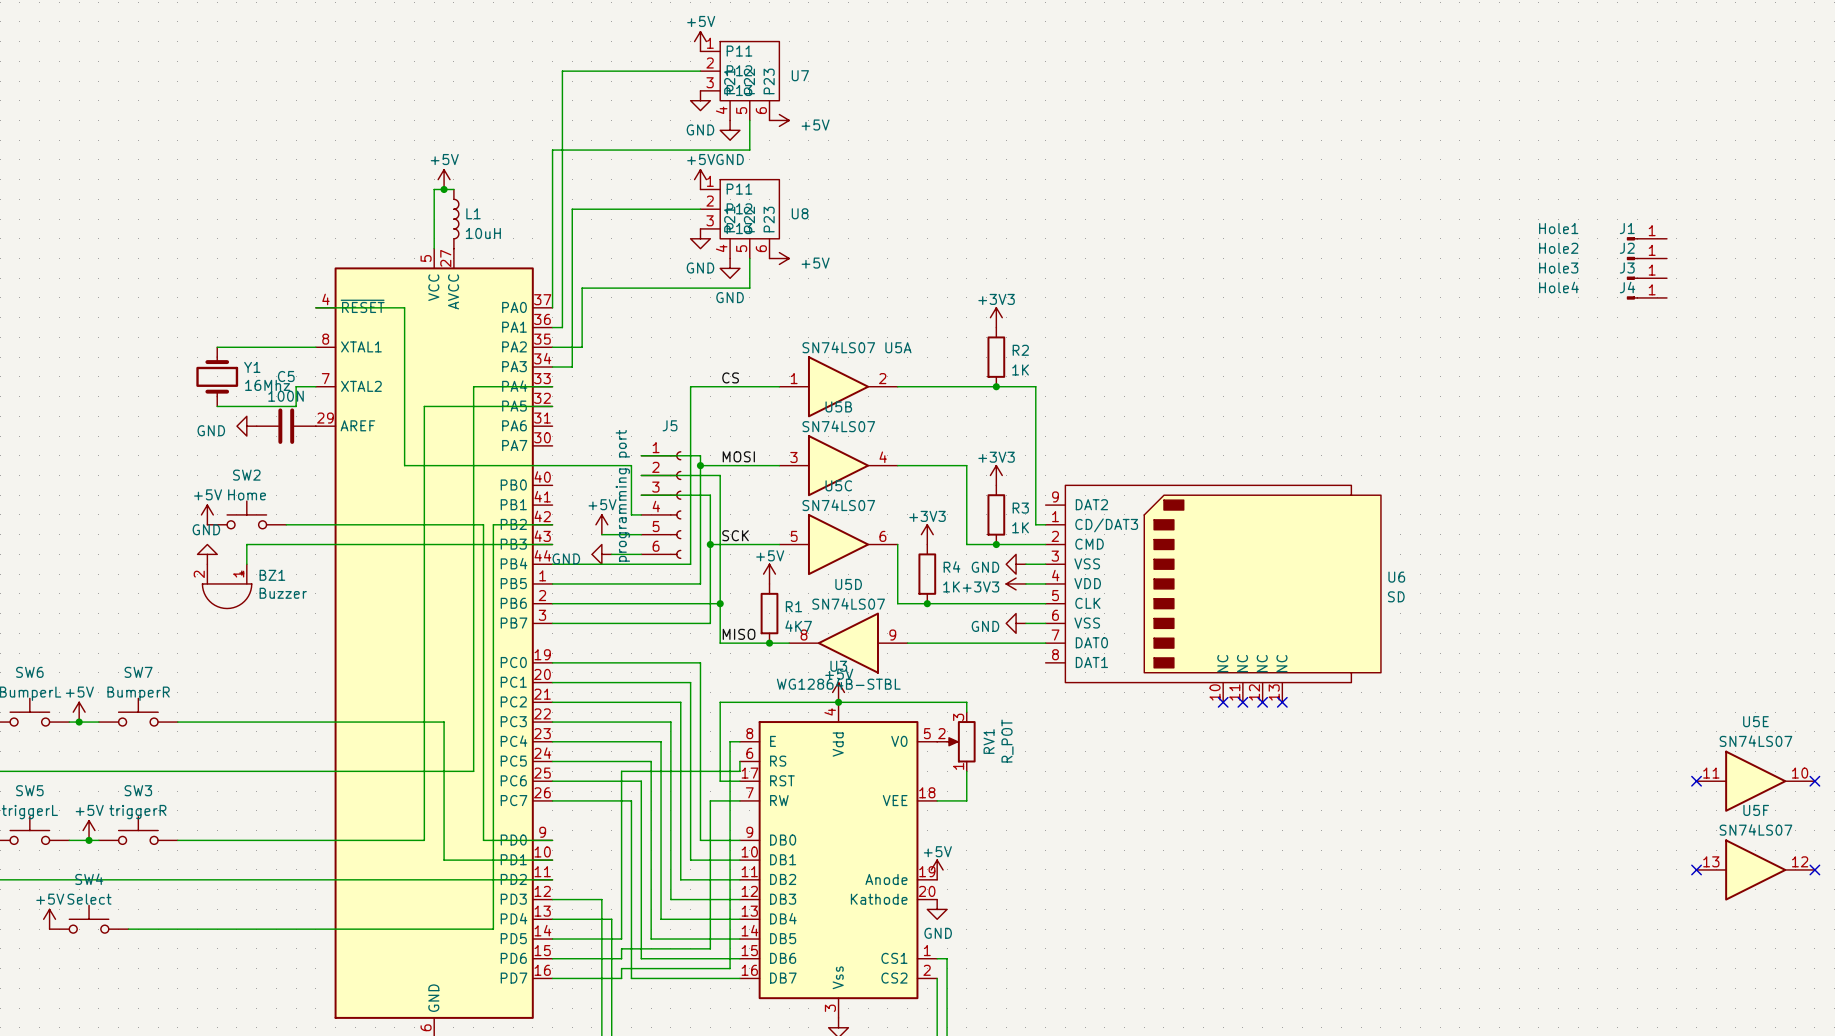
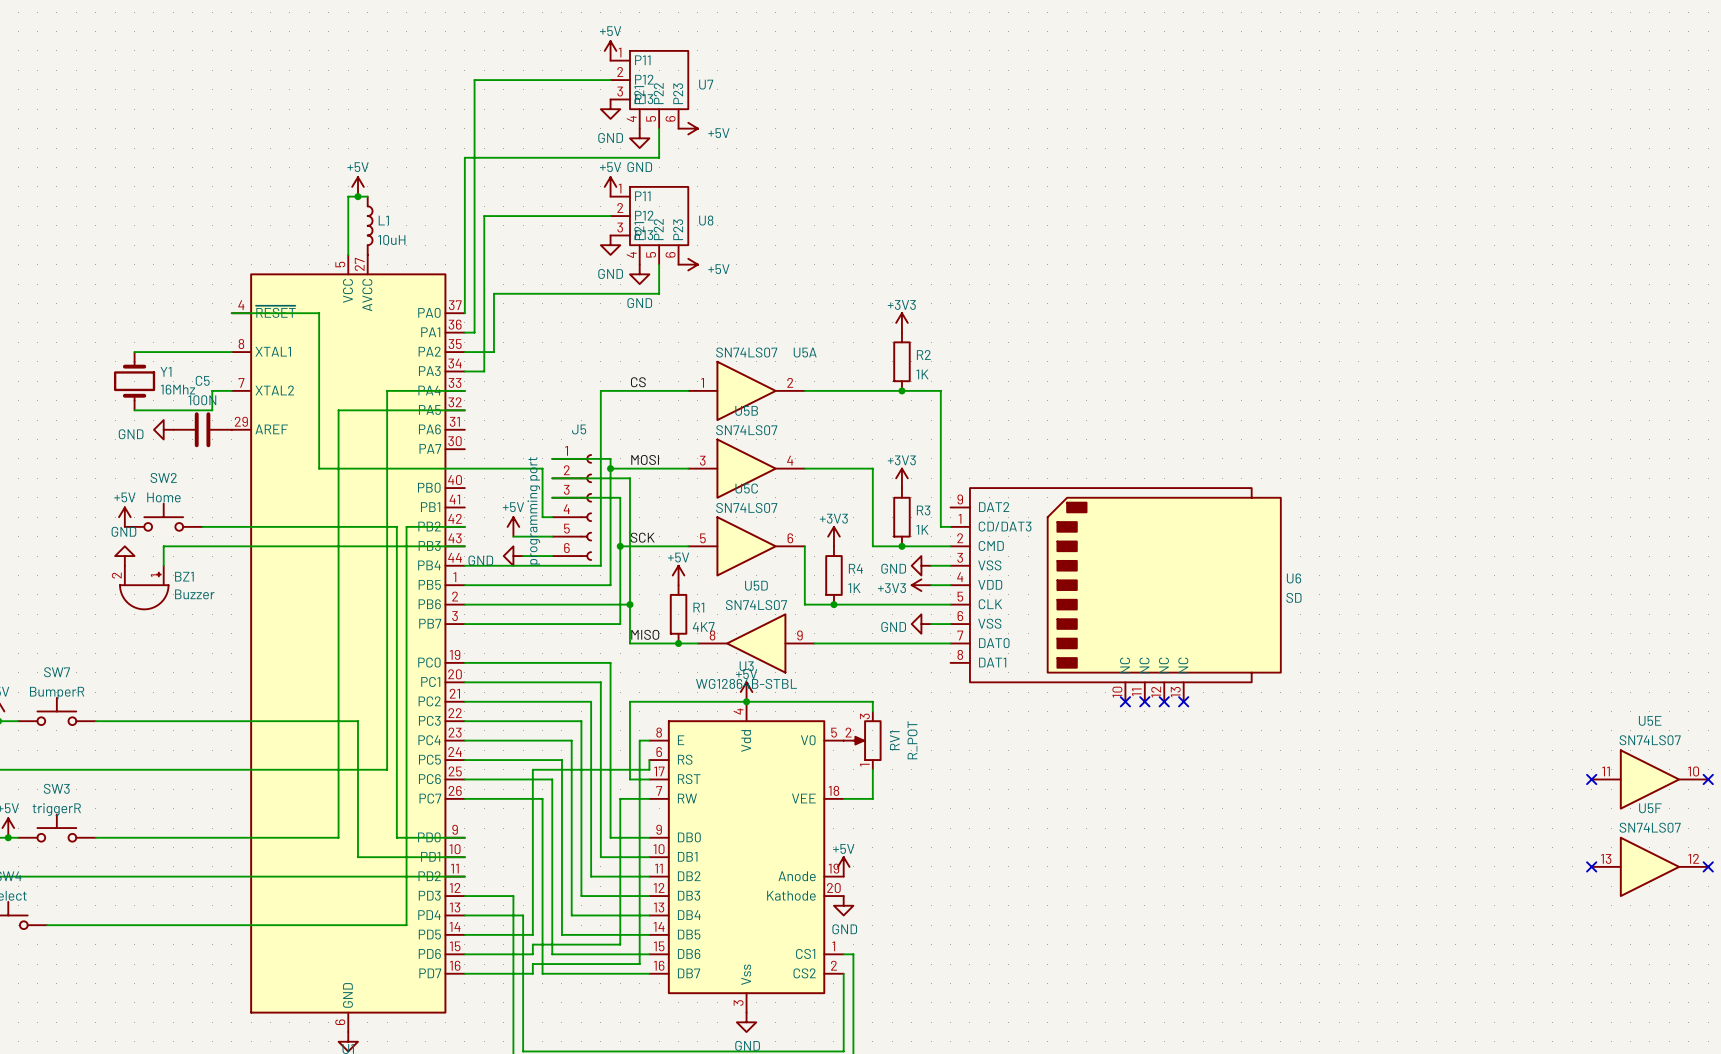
J1: Hole1 (1646, 238) -> none
J2: Hole2 (1646, 258) -> none
J3: Hole3 (1646, 278) -> none
J4: Hole4 (1646, 297) -> none

